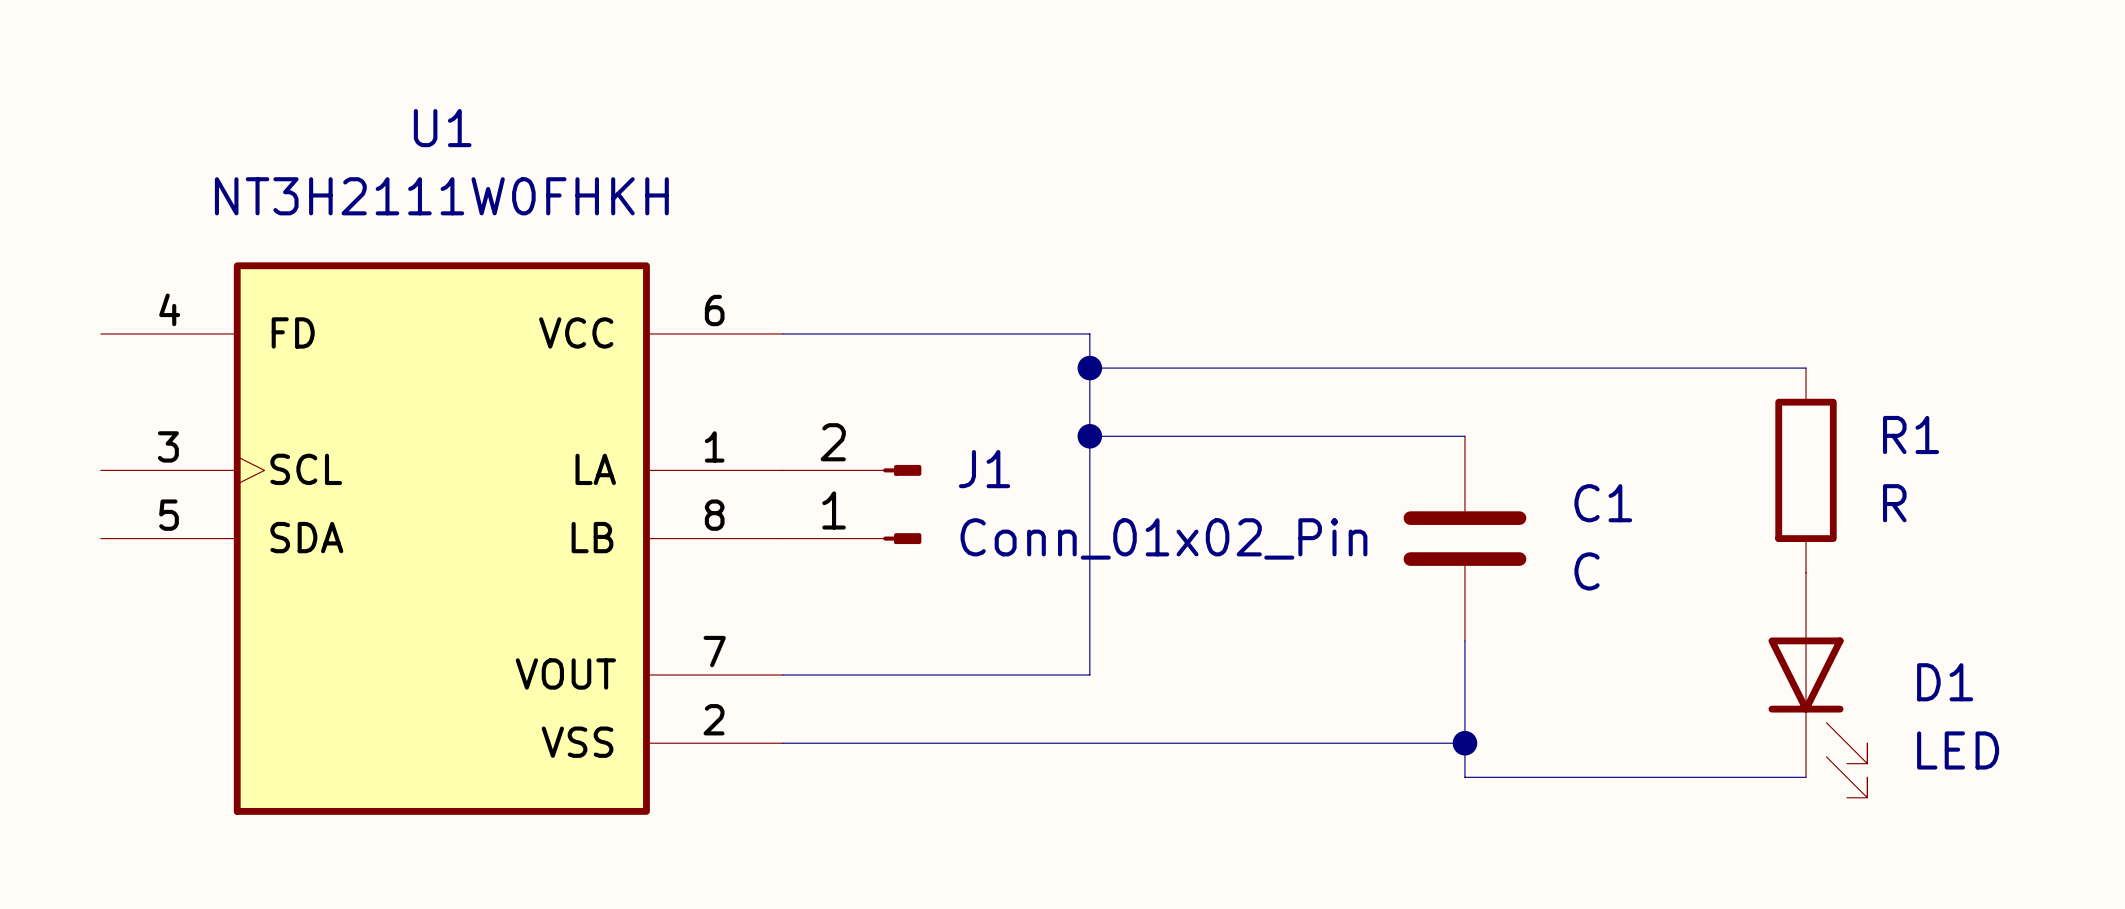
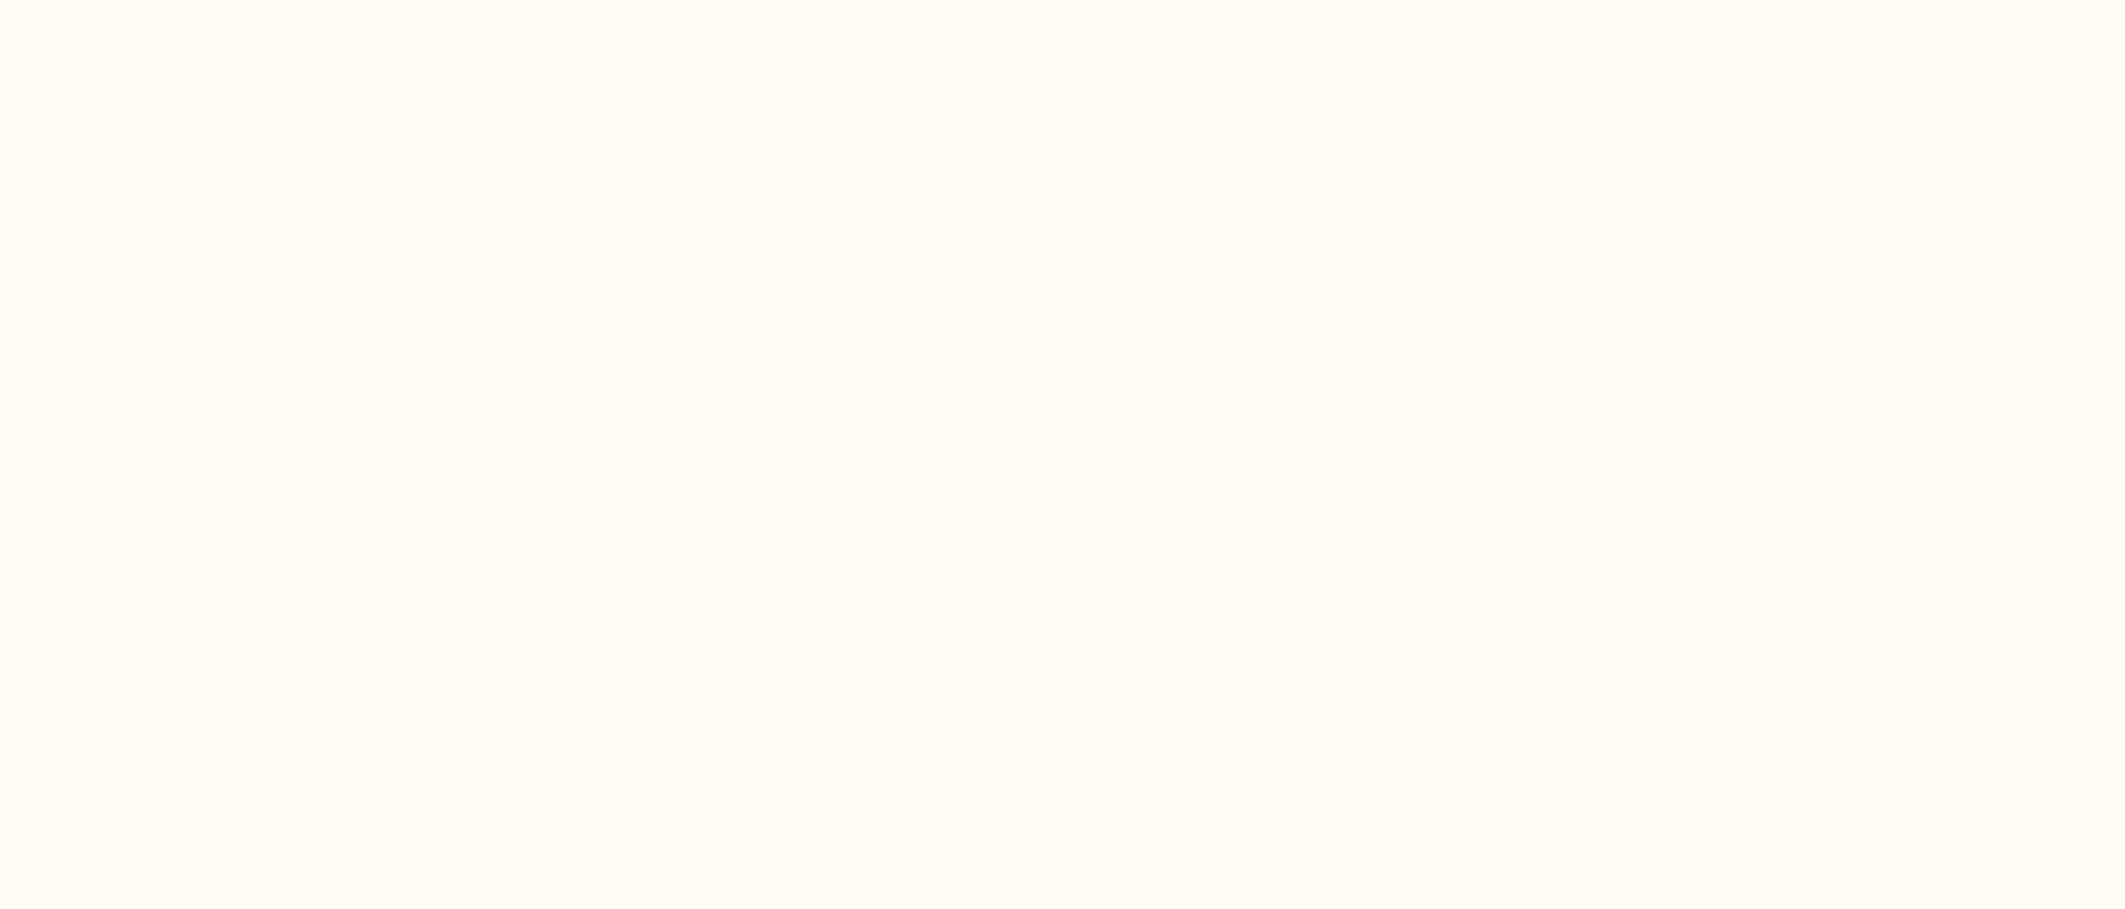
wire: (782, 333) (1089, 333) (1089, 675) (782, 675) -> none
wire: (1089, 368) (1806, 368) -> none
junction: (1089, 368) -> none
wire: (1089, 436) (1464, 436) -> none
junction: (1089, 436) -> none
R1: R (1806, 470) -> none
J1: Conn_01x02_Pin (852, 504) -> none
U1: NT3H2111W0FHKH (441, 538) -> none
C1: C (1464, 538) -> none
wire: (1464, 640) (1464, 777) (1806, 777) -> none
D1: LED (1817, 685) -> none
wire: (782, 743) (1464, 743) -> none
junction: (1464, 743) -> none

